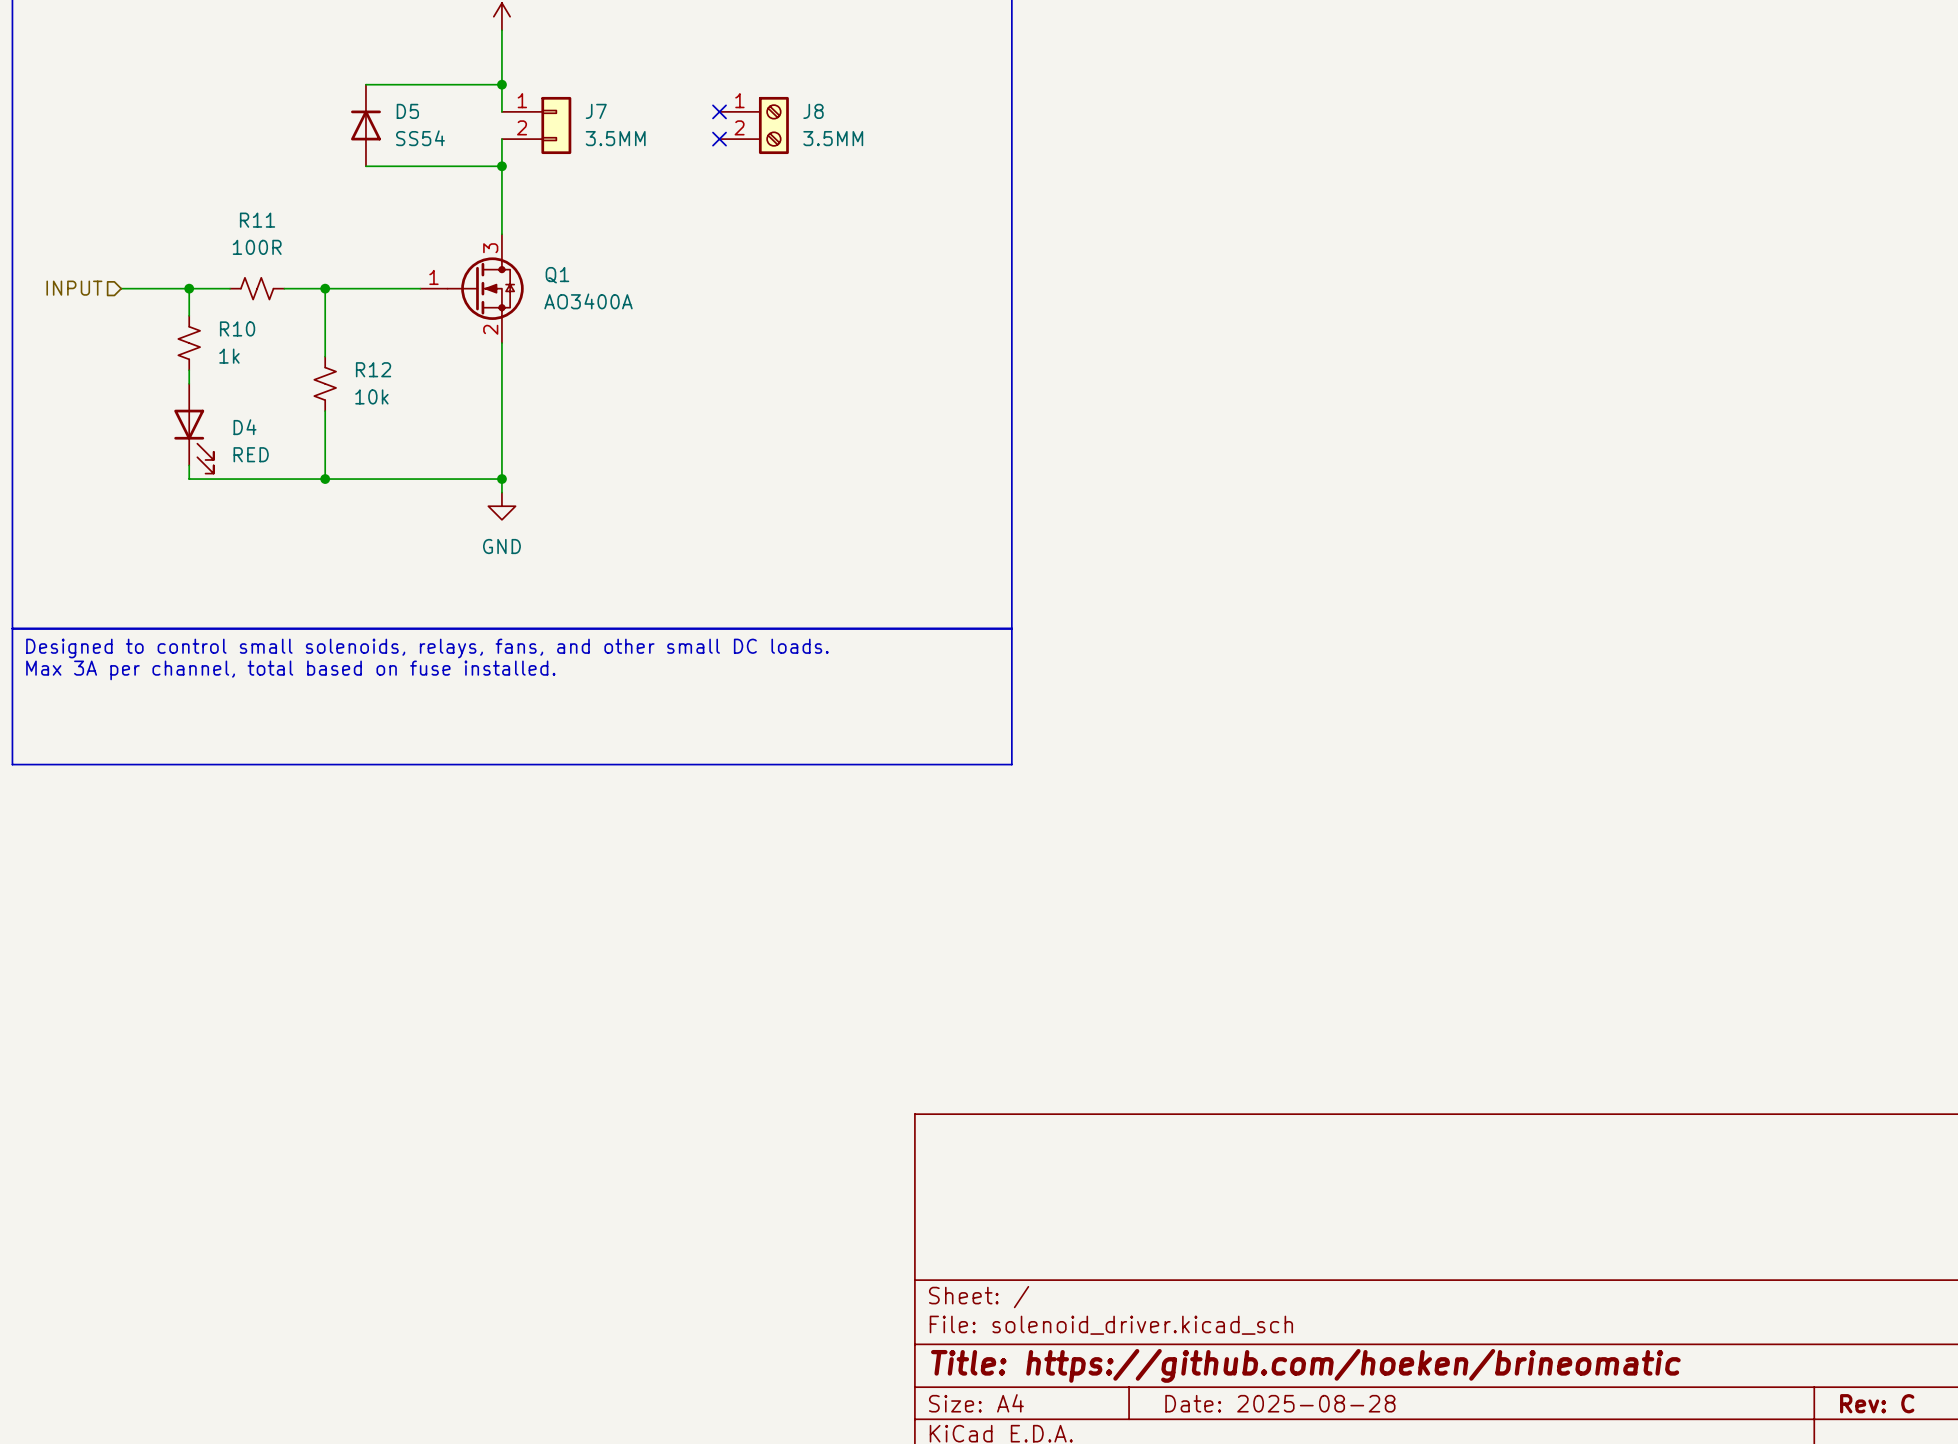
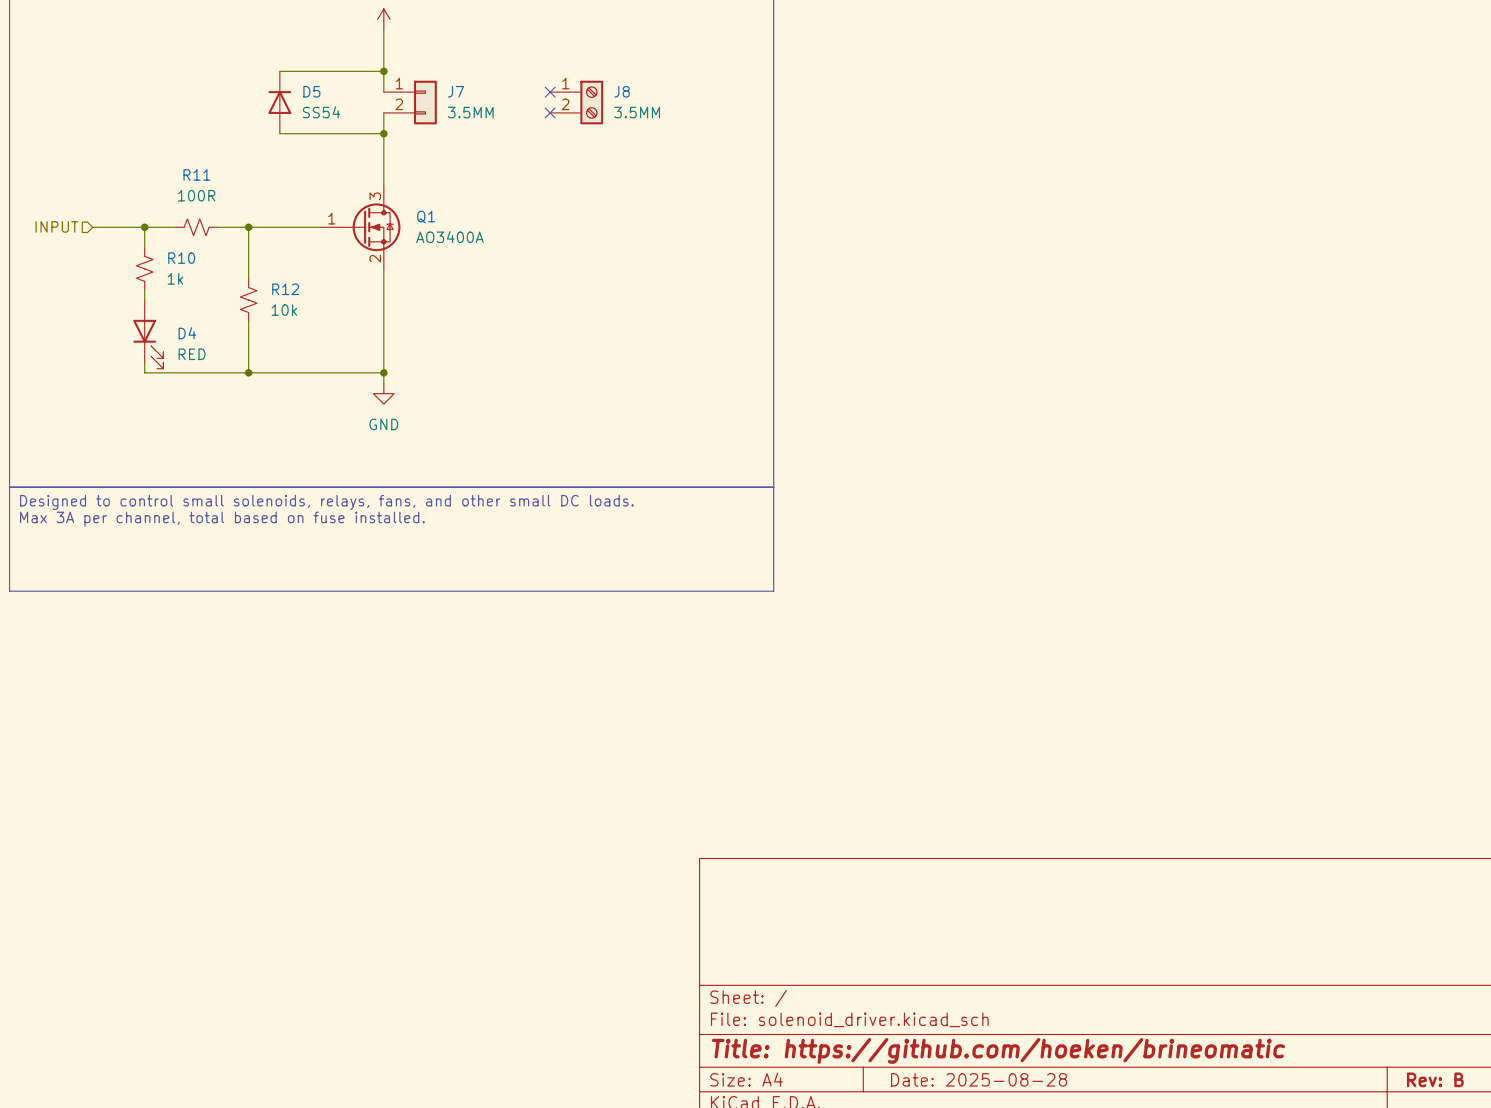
title block: Rev: C (1877, 1403) -> Rev: B (1435, 1079)

